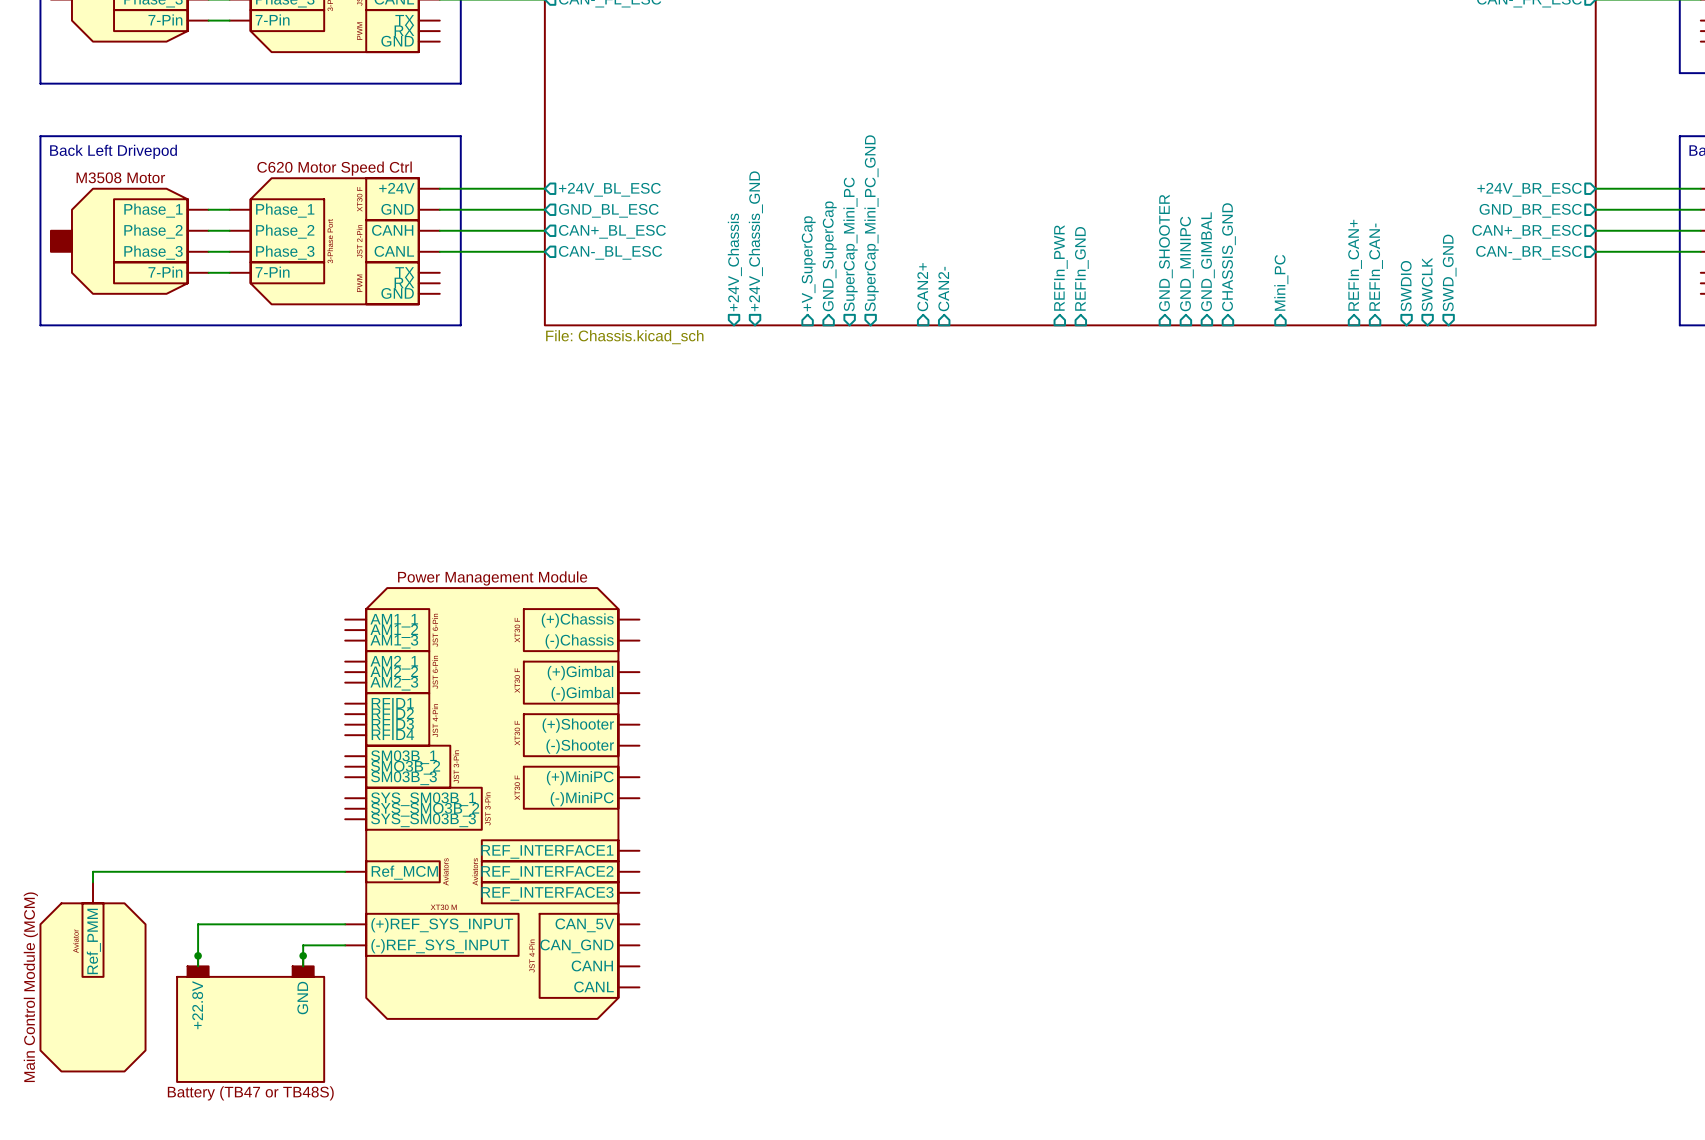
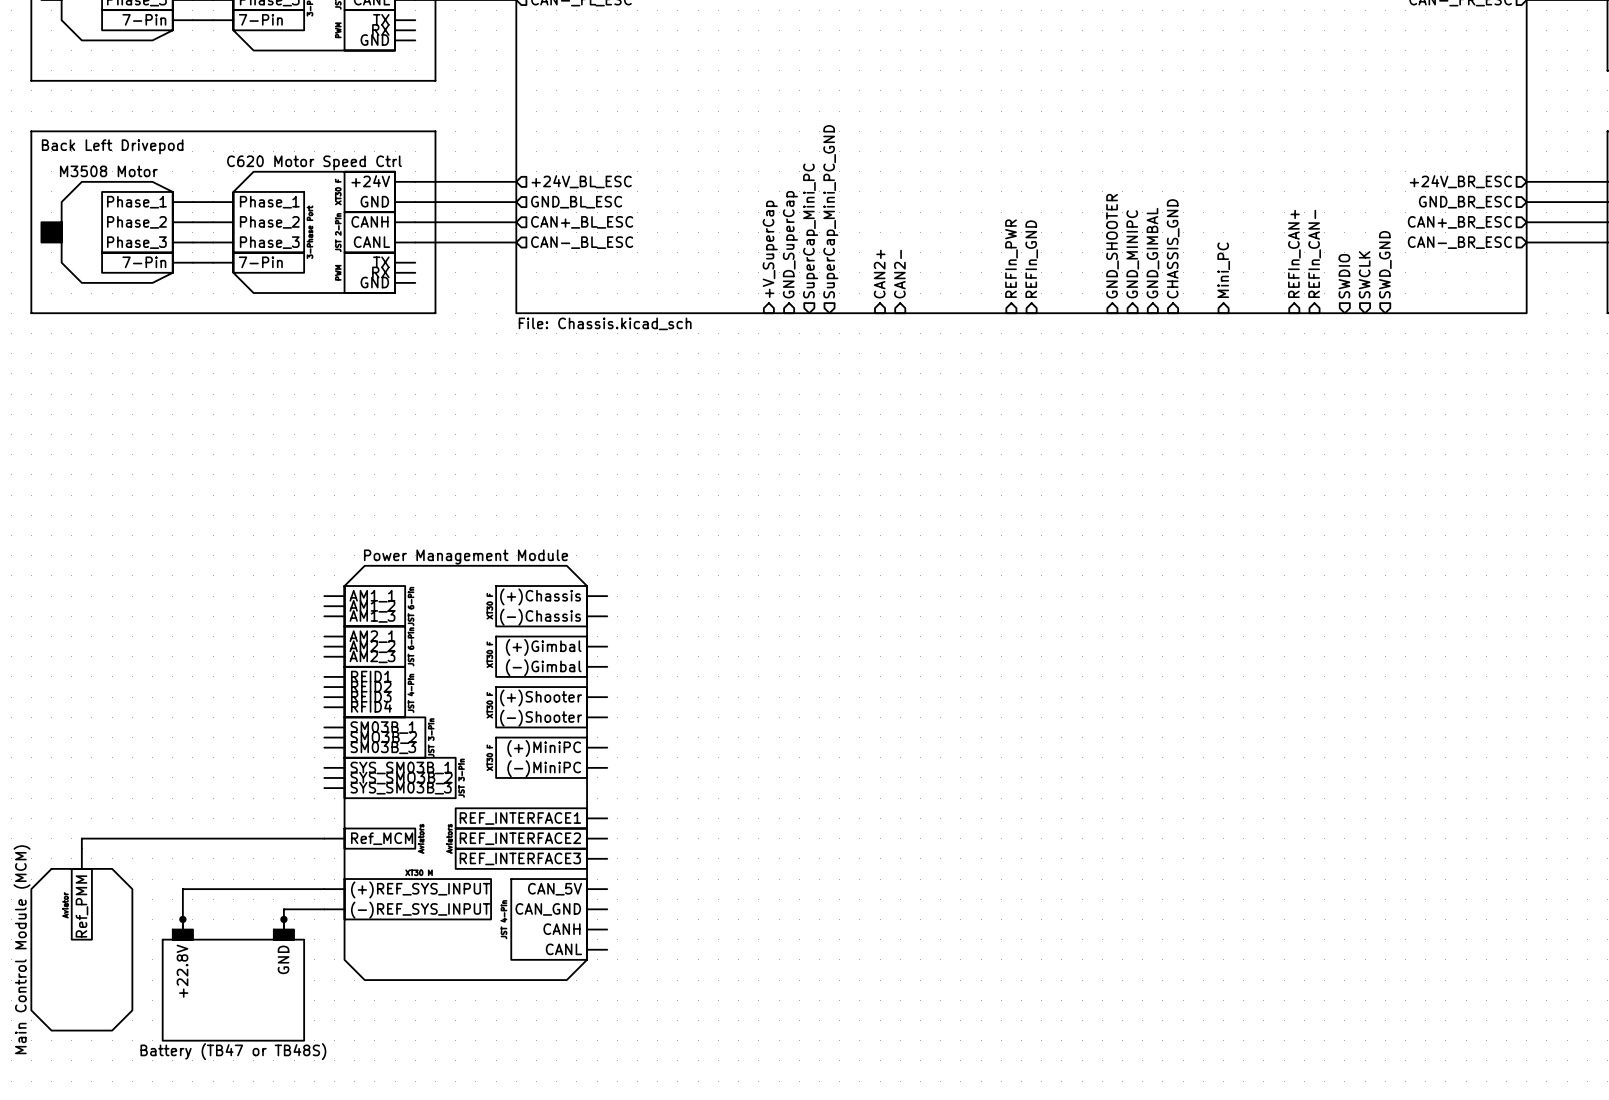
sheet pin: +24V_Chassis_GND (755, 241) -> none
sheet pin: +24V_Chassis (734, 262) -> none

